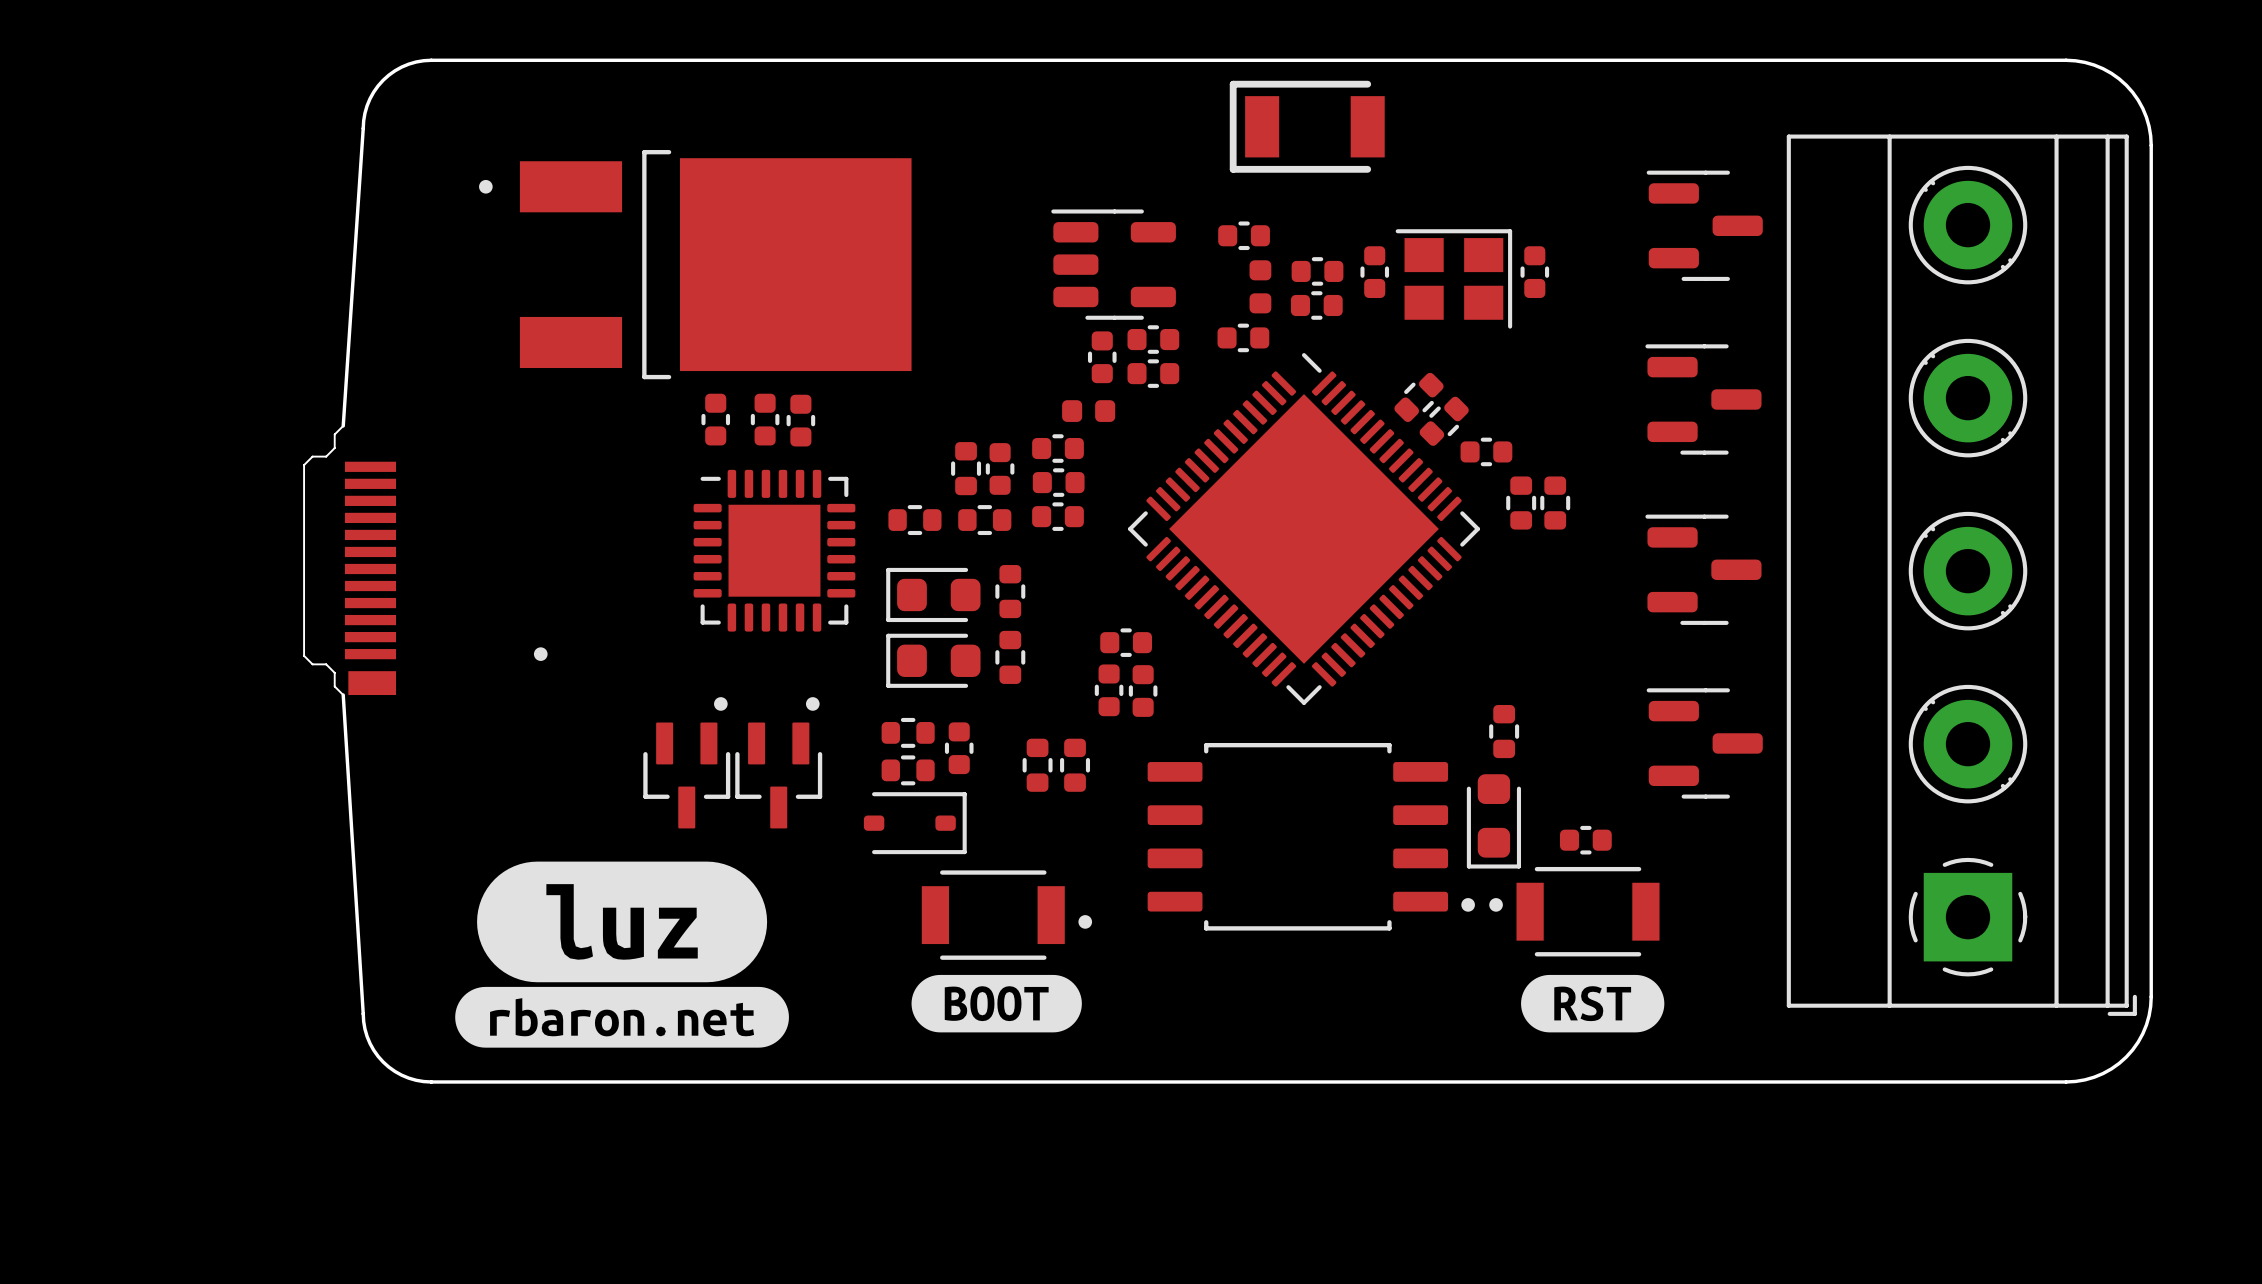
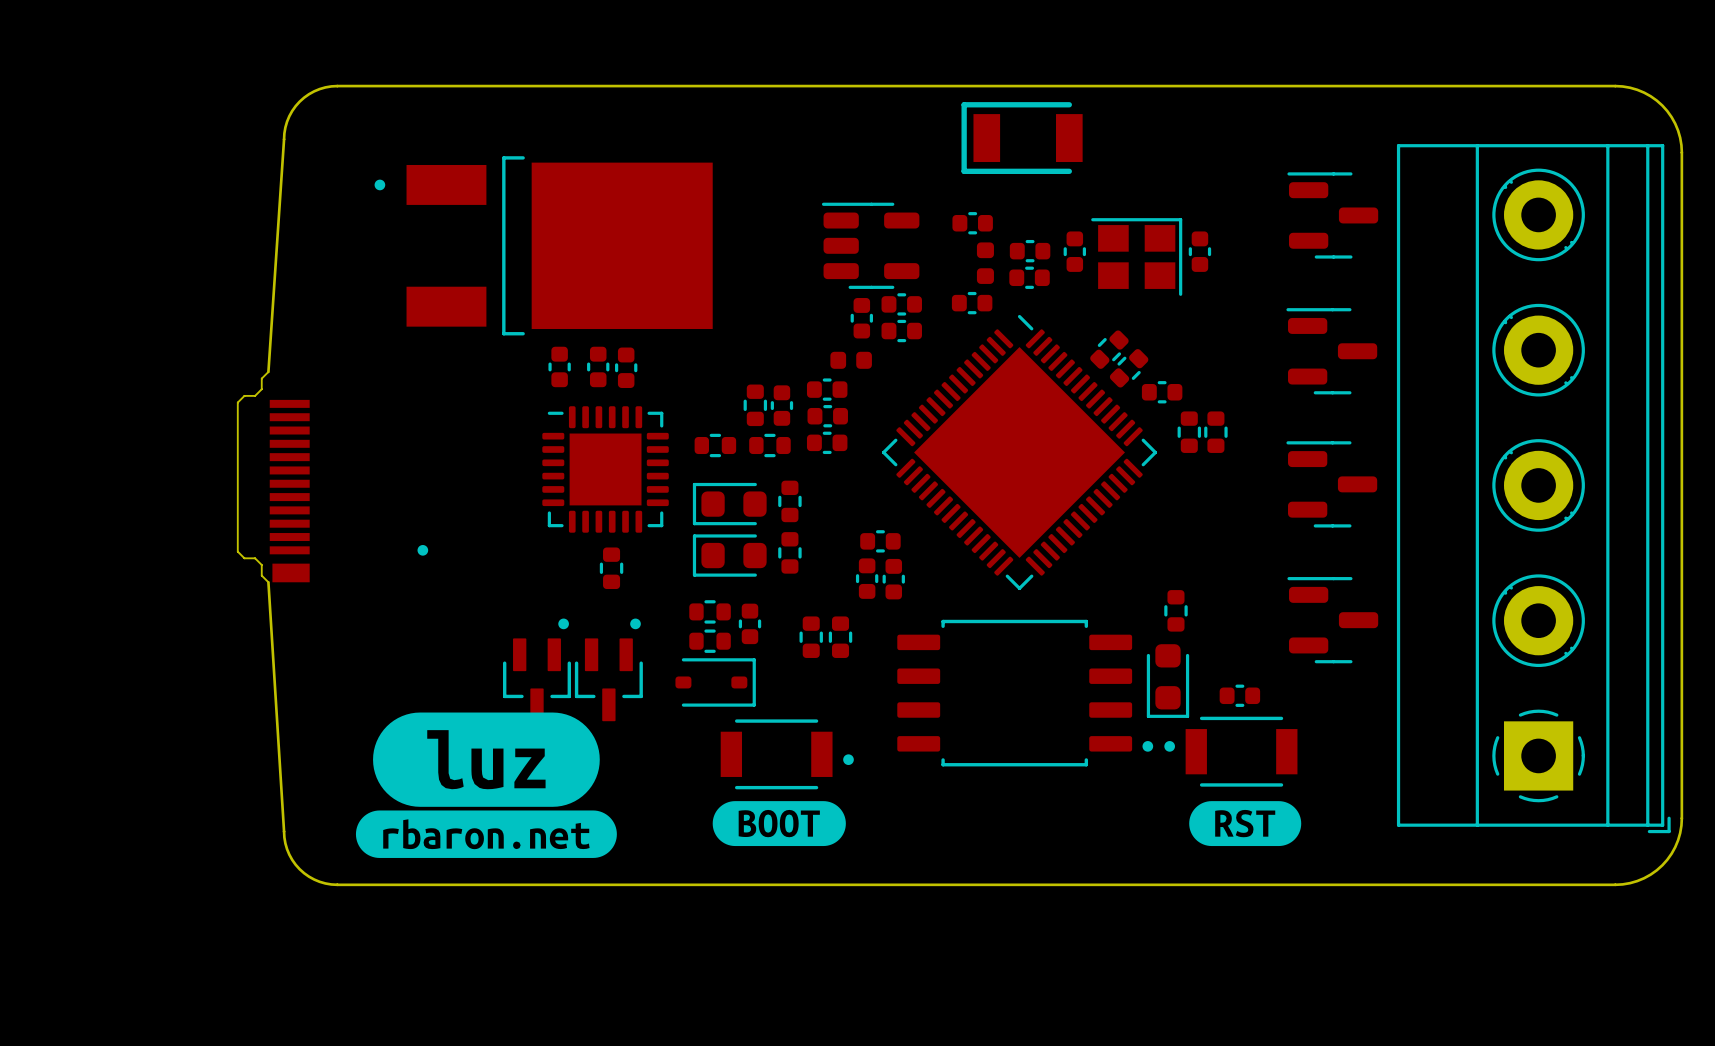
part: none -> (611, 568)
part position: (686, 762) -> (536, 669)
part position: (778, 762) -> (608, 669)

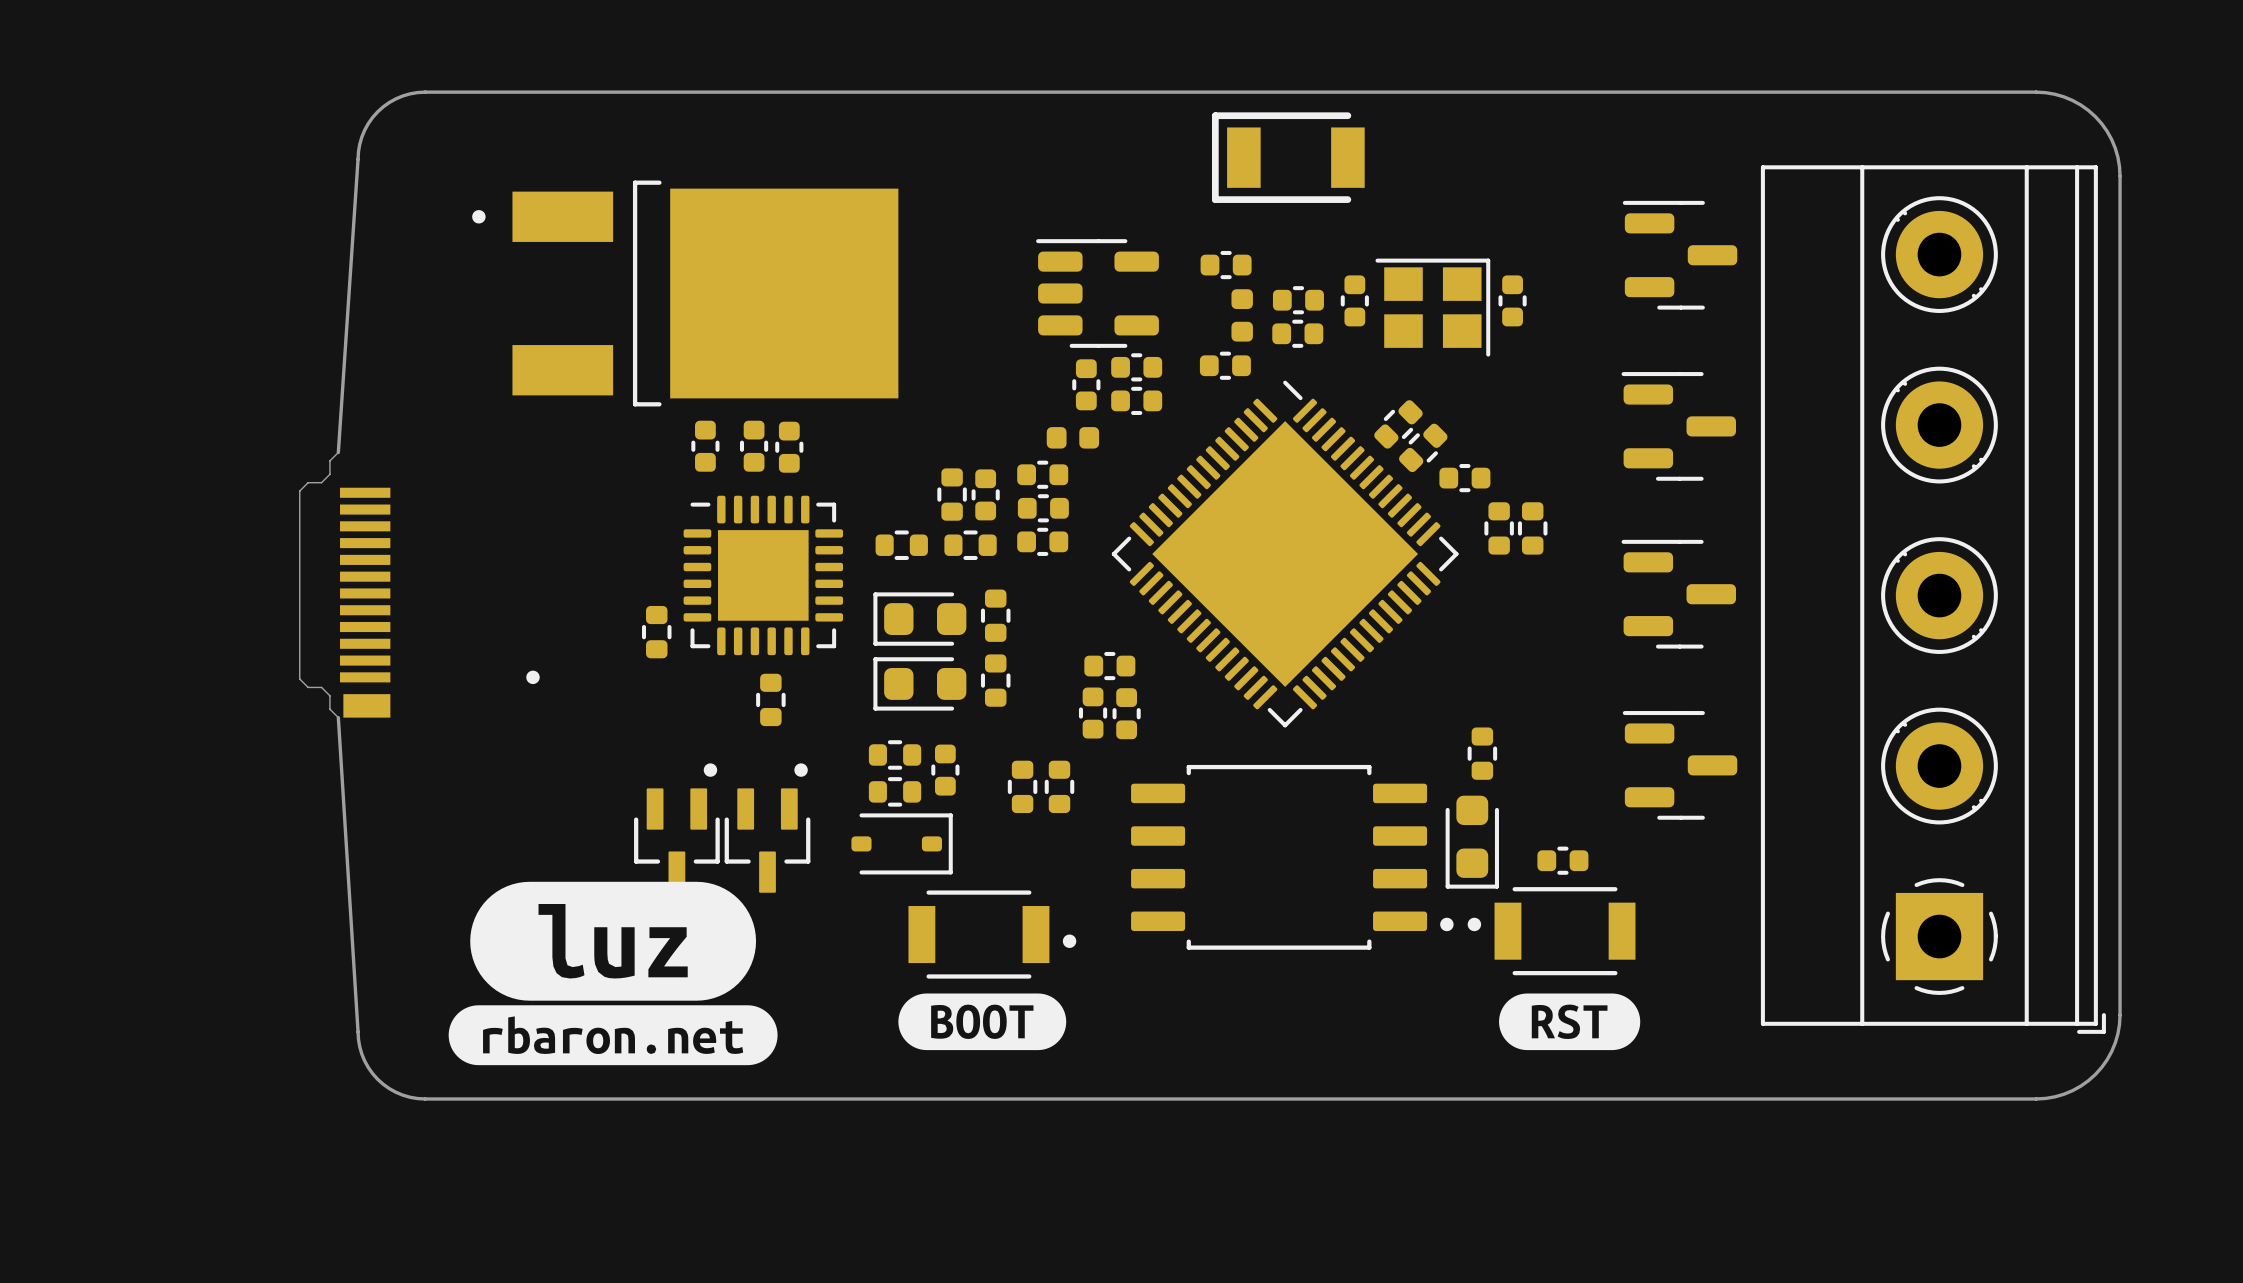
part: none -> (656, 632)

